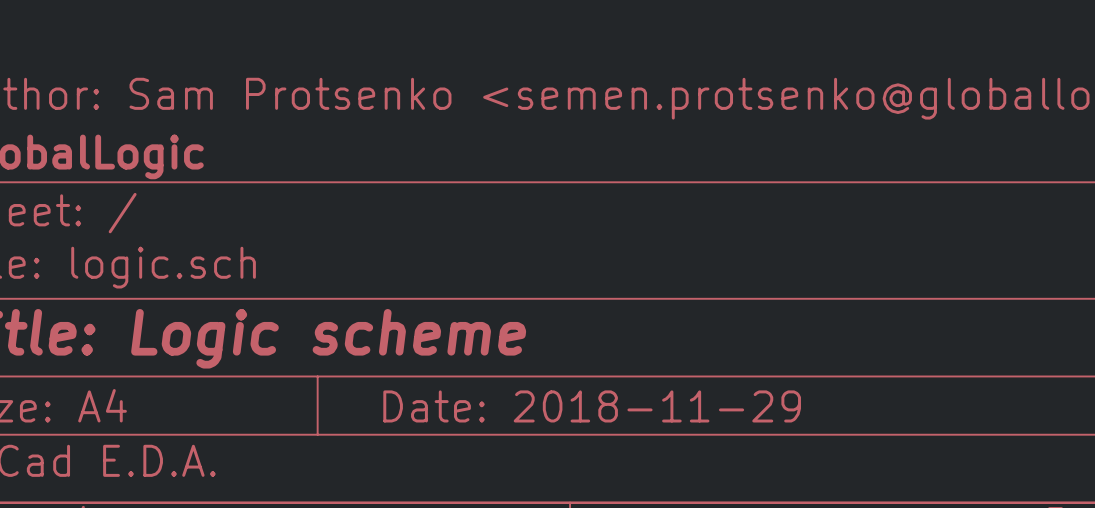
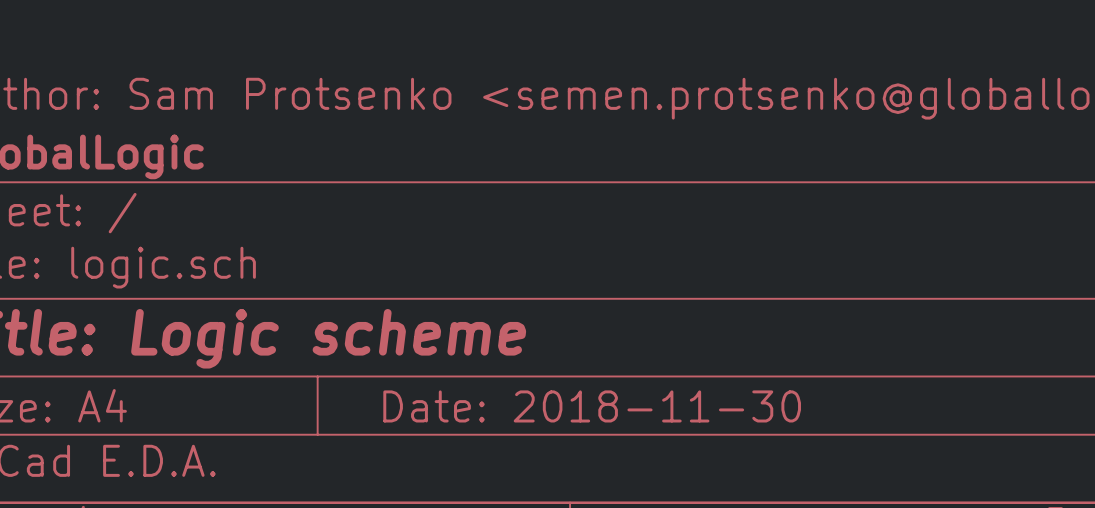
title block: Date: 2018-11-29 (592, 406) -> Date: 2018-11-30 (592, 406)

